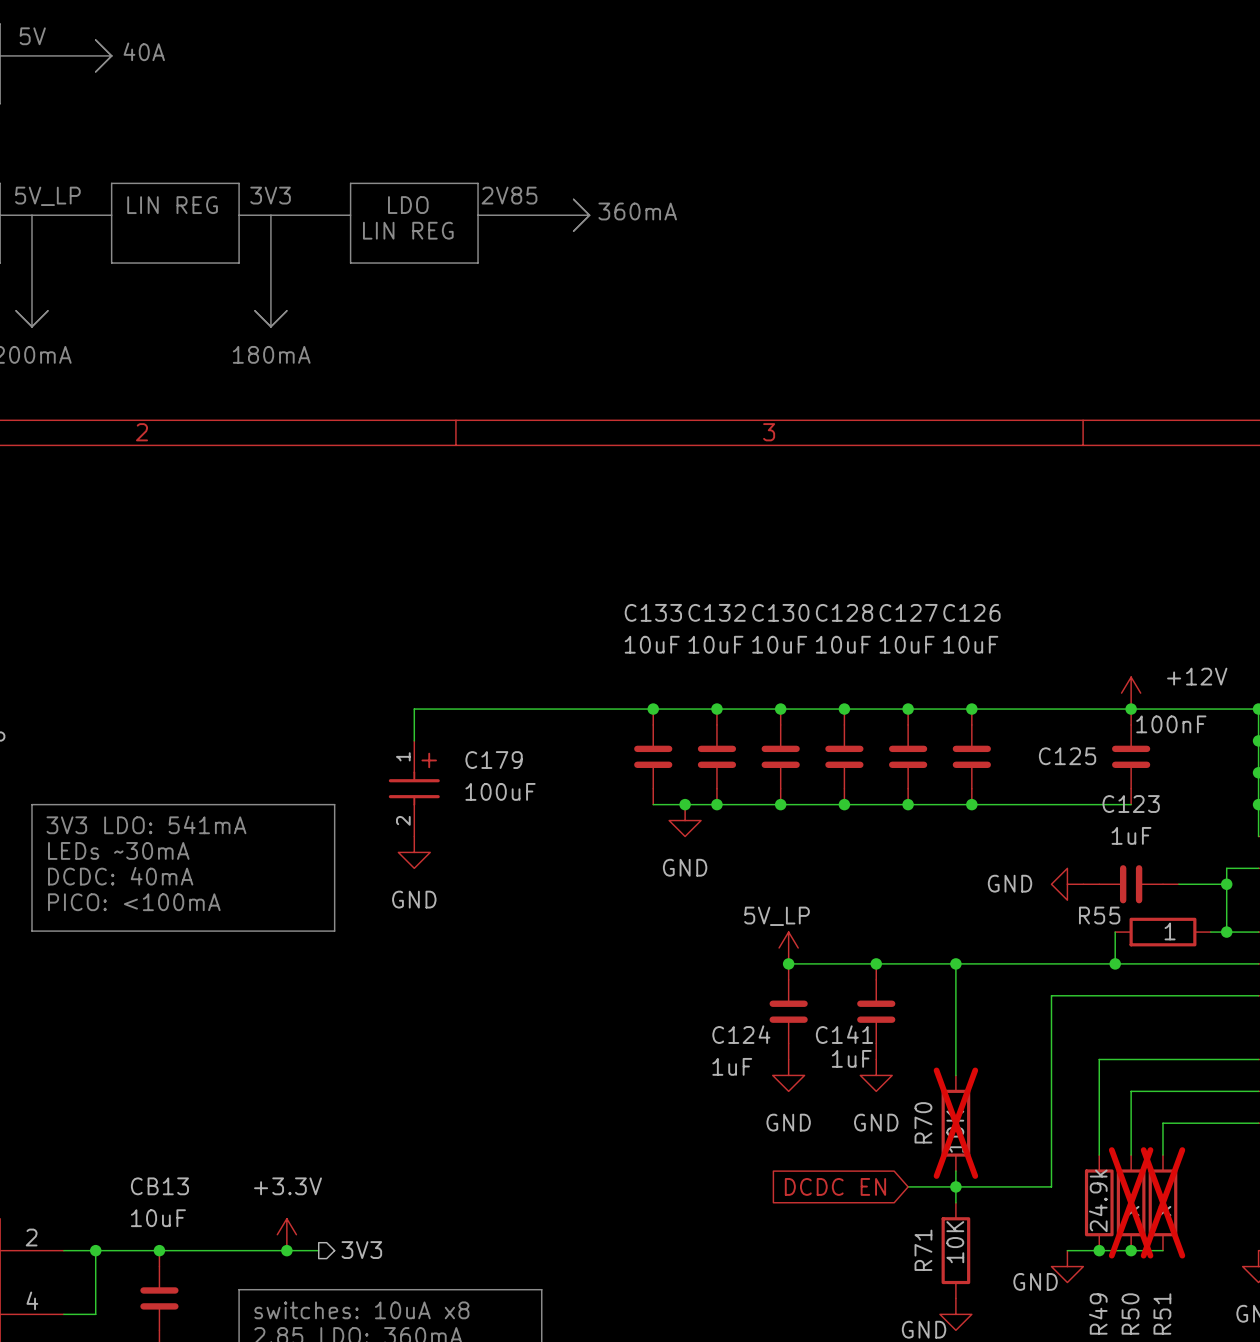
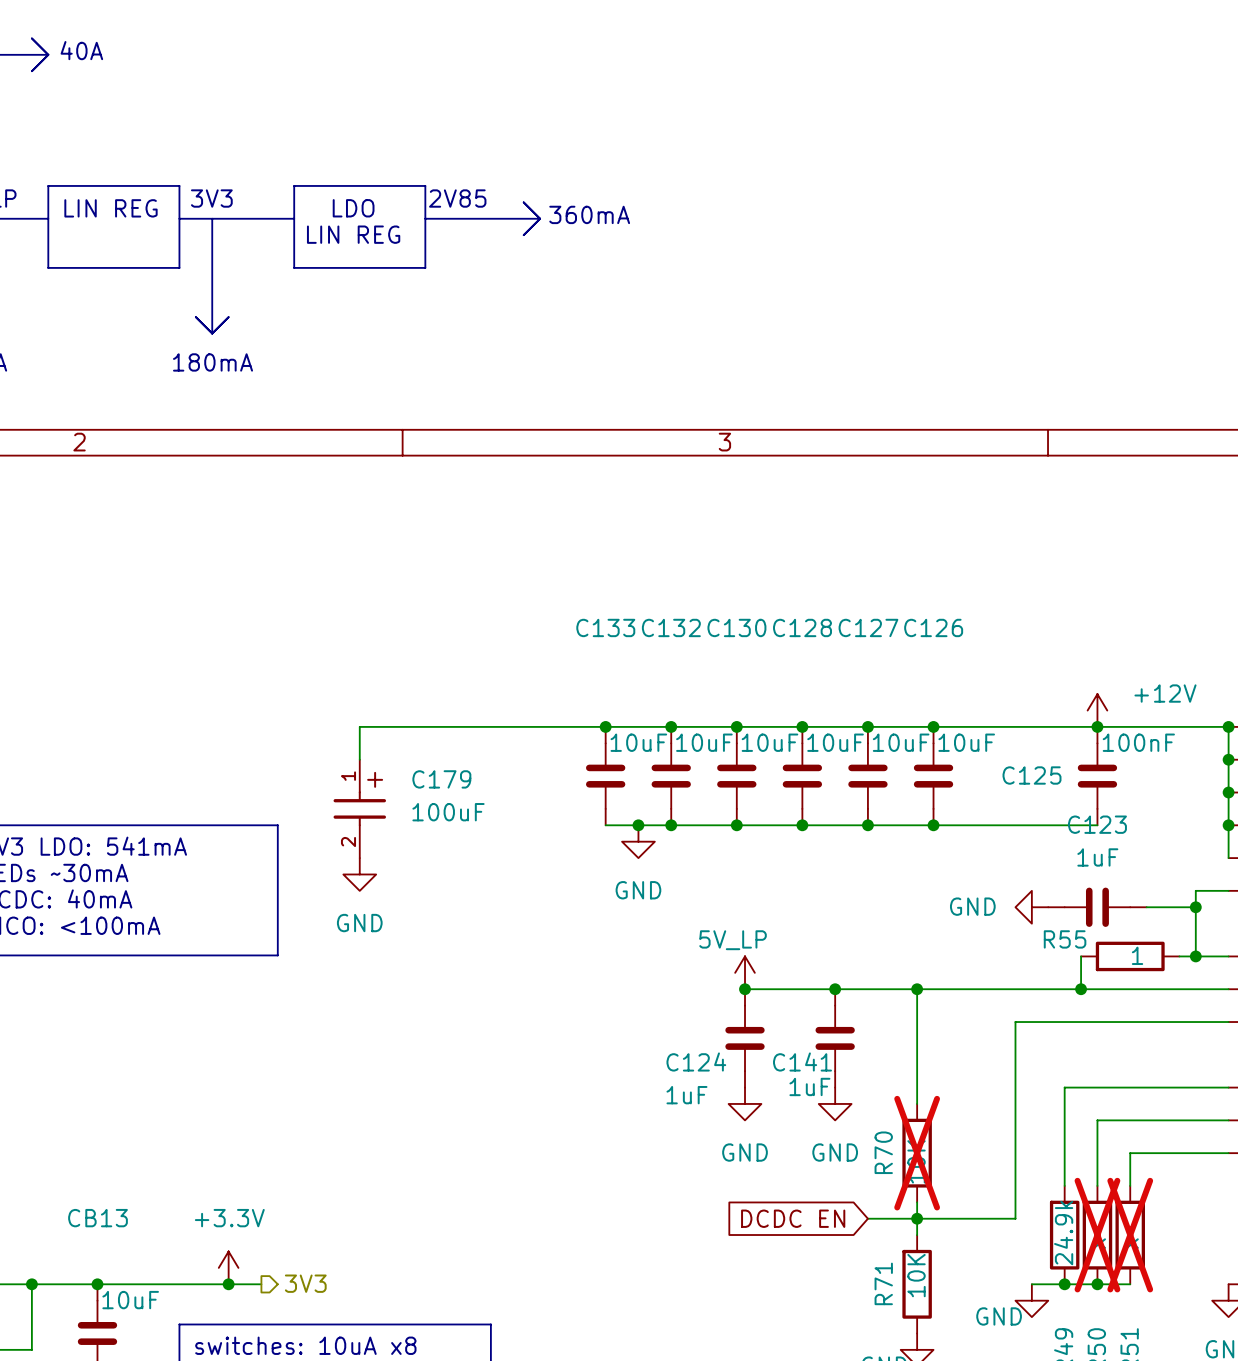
C133 value position: 10uF (652, 644) -> 10uF (638, 742)
C132 value position: 10uF (715, 644) -> 10uF (704, 742)
C130 value position: 10uF (779, 644) -> 10uF (769, 742)
C128 value position: 10uF (843, 644) -> 10uF (835, 742)
C127 value position: 10uF (907, 644) -> 10uF (901, 742)
C126 value position: 10uF (970, 644) -> 10uF (966, 742)
CB13 value position: 10uF (158, 1218) -> 10uF (130, 1300)

